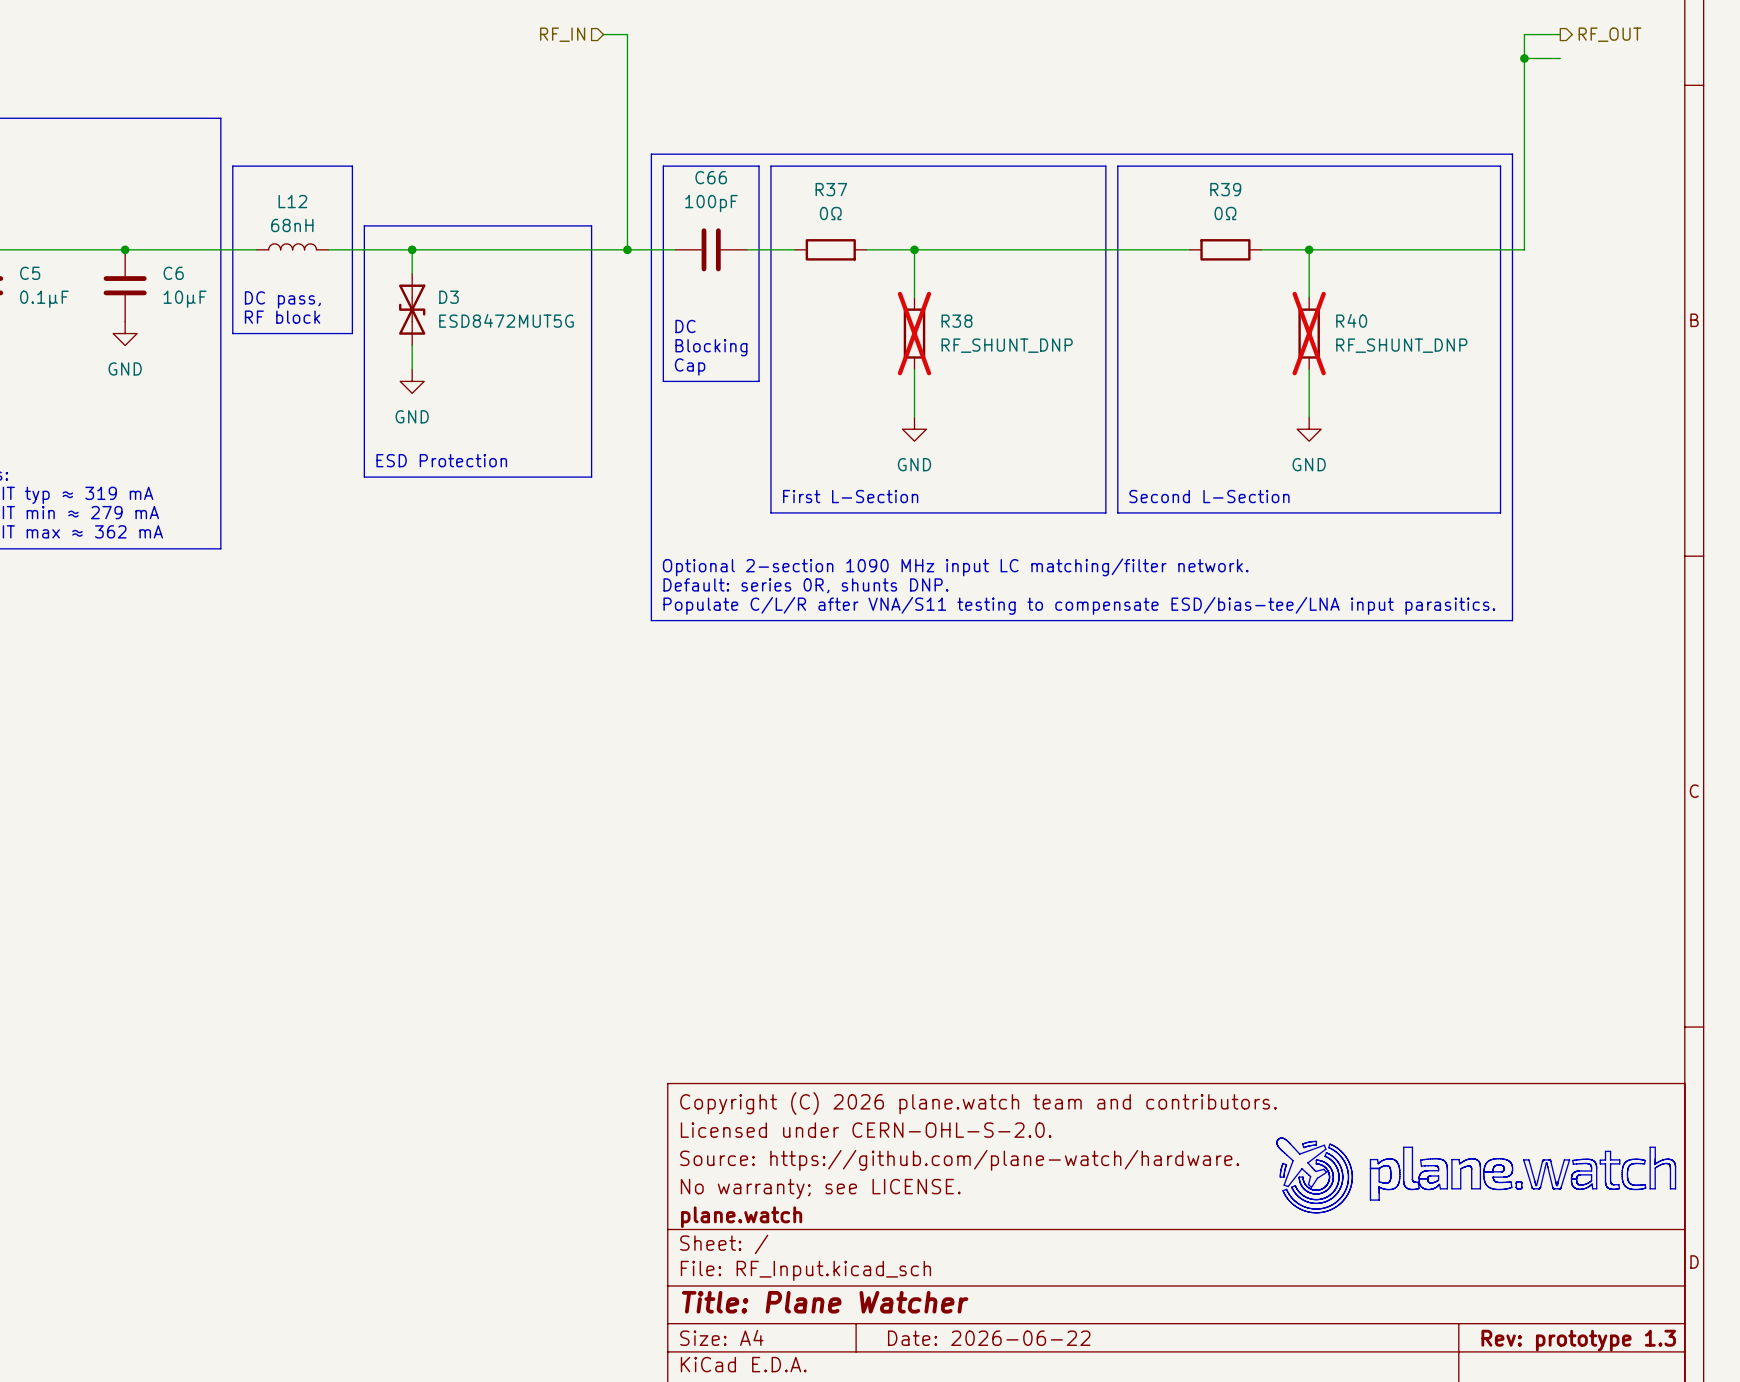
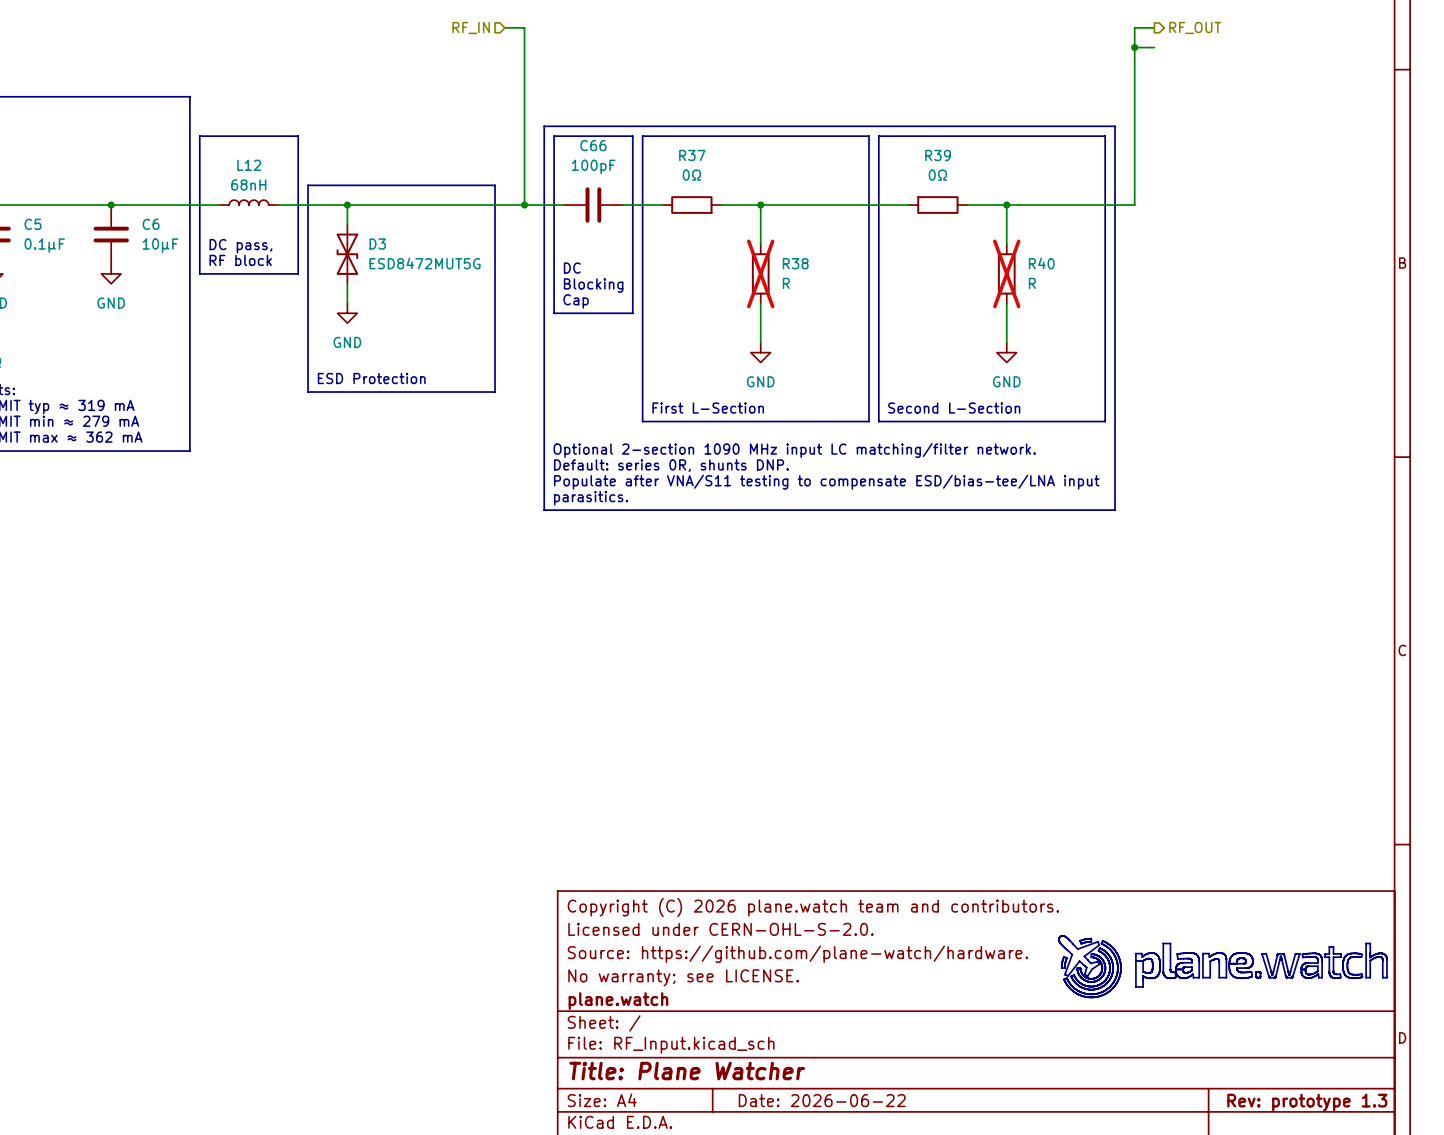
wire: (1560, 34) (1524, 34) (1524, 249) (1368, 249) -> (1154, 27) (1134, 27) (1134, 205)
hierarchical label position: RF_OUT (1610, 34) -> RF_OUT (1195, 27)
wire: none -> (1134, 47) (1154, 47)
junction: none -> (1134, 47)
wire: (1524, 58) (1560, 58) -> none
junction: (1524, 58) -> none
line: (1345, 154) (1512, 154) (1512, 620) (1345, 620) -> (1115, 126) (1115, 510)
line: (1046, 166) (1058, 166) -> (868, 136) (868, 421)
line: (1105, 166) (1105, 512) -> (918, 136) (928, 136)
line: (1117, 166) (1117, 512) -> (918, 421) (928, 421)
line: (1333, 166) (1500, 166) (1500, 512) (1333, 512) -> (1105, 136) (1105, 421)
wire: (1093, 249) (1165, 249) -> (987, 205) (1046, 205)
junction: none -> (1006, 205)
R39 position: (1225, 249) -> (937, 205)
wire: (1309, 249) (1309, 297) -> (1006, 205) (1006, 244)
junction: (1309, 249) -> none
R40 position: (1309, 333) -> (1006, 273)
R38 value: RF_SHUNT_DNP (1007, 345) -> R (786, 283)
R40 value: RF_SHUNT_DNP (1401, 345) -> R (1032, 283)
wire: (1309, 369) (1309, 417) -> (1006, 303) (1006, 342)
power symbol position: GND (1309, 429) -> GND (1006, 352)
text position: Second L-Section (1209, 496) -> Second L-Section (954, 408)
line: (1046, 512) (1058, 512) -> (878, 136) (878, 421)
text: none -> Optional 2-section 1090 MHz input LC matching/filter network. (794, 450)
text: Optional 2-section 1090 MHz input LC matching/filter network. (955, 567) -> Default: series 0R, shunts DNP. (671, 465)
text: Default: series 0R, shunts DNP. (805, 585) -> Populate after VNA/S11 testing to compensate ESD/bias-tee/LNA input (826, 482)
text: Populate C/L/R after VNA/S11 testing to compensate ESD/bias-tee/LNA input parasitics. (1079, 605) -> parasitics. (591, 498)

